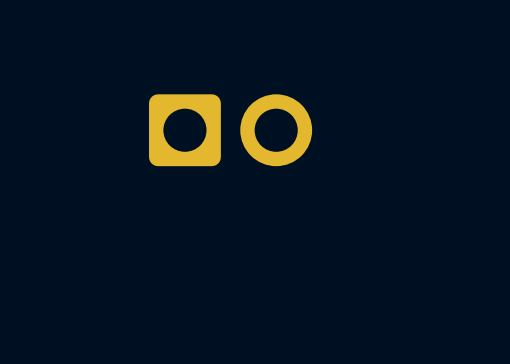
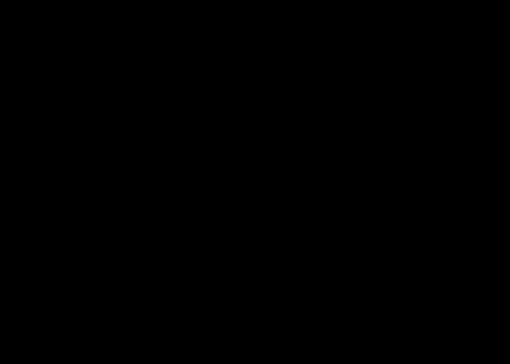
part: (230, 130) -> none

